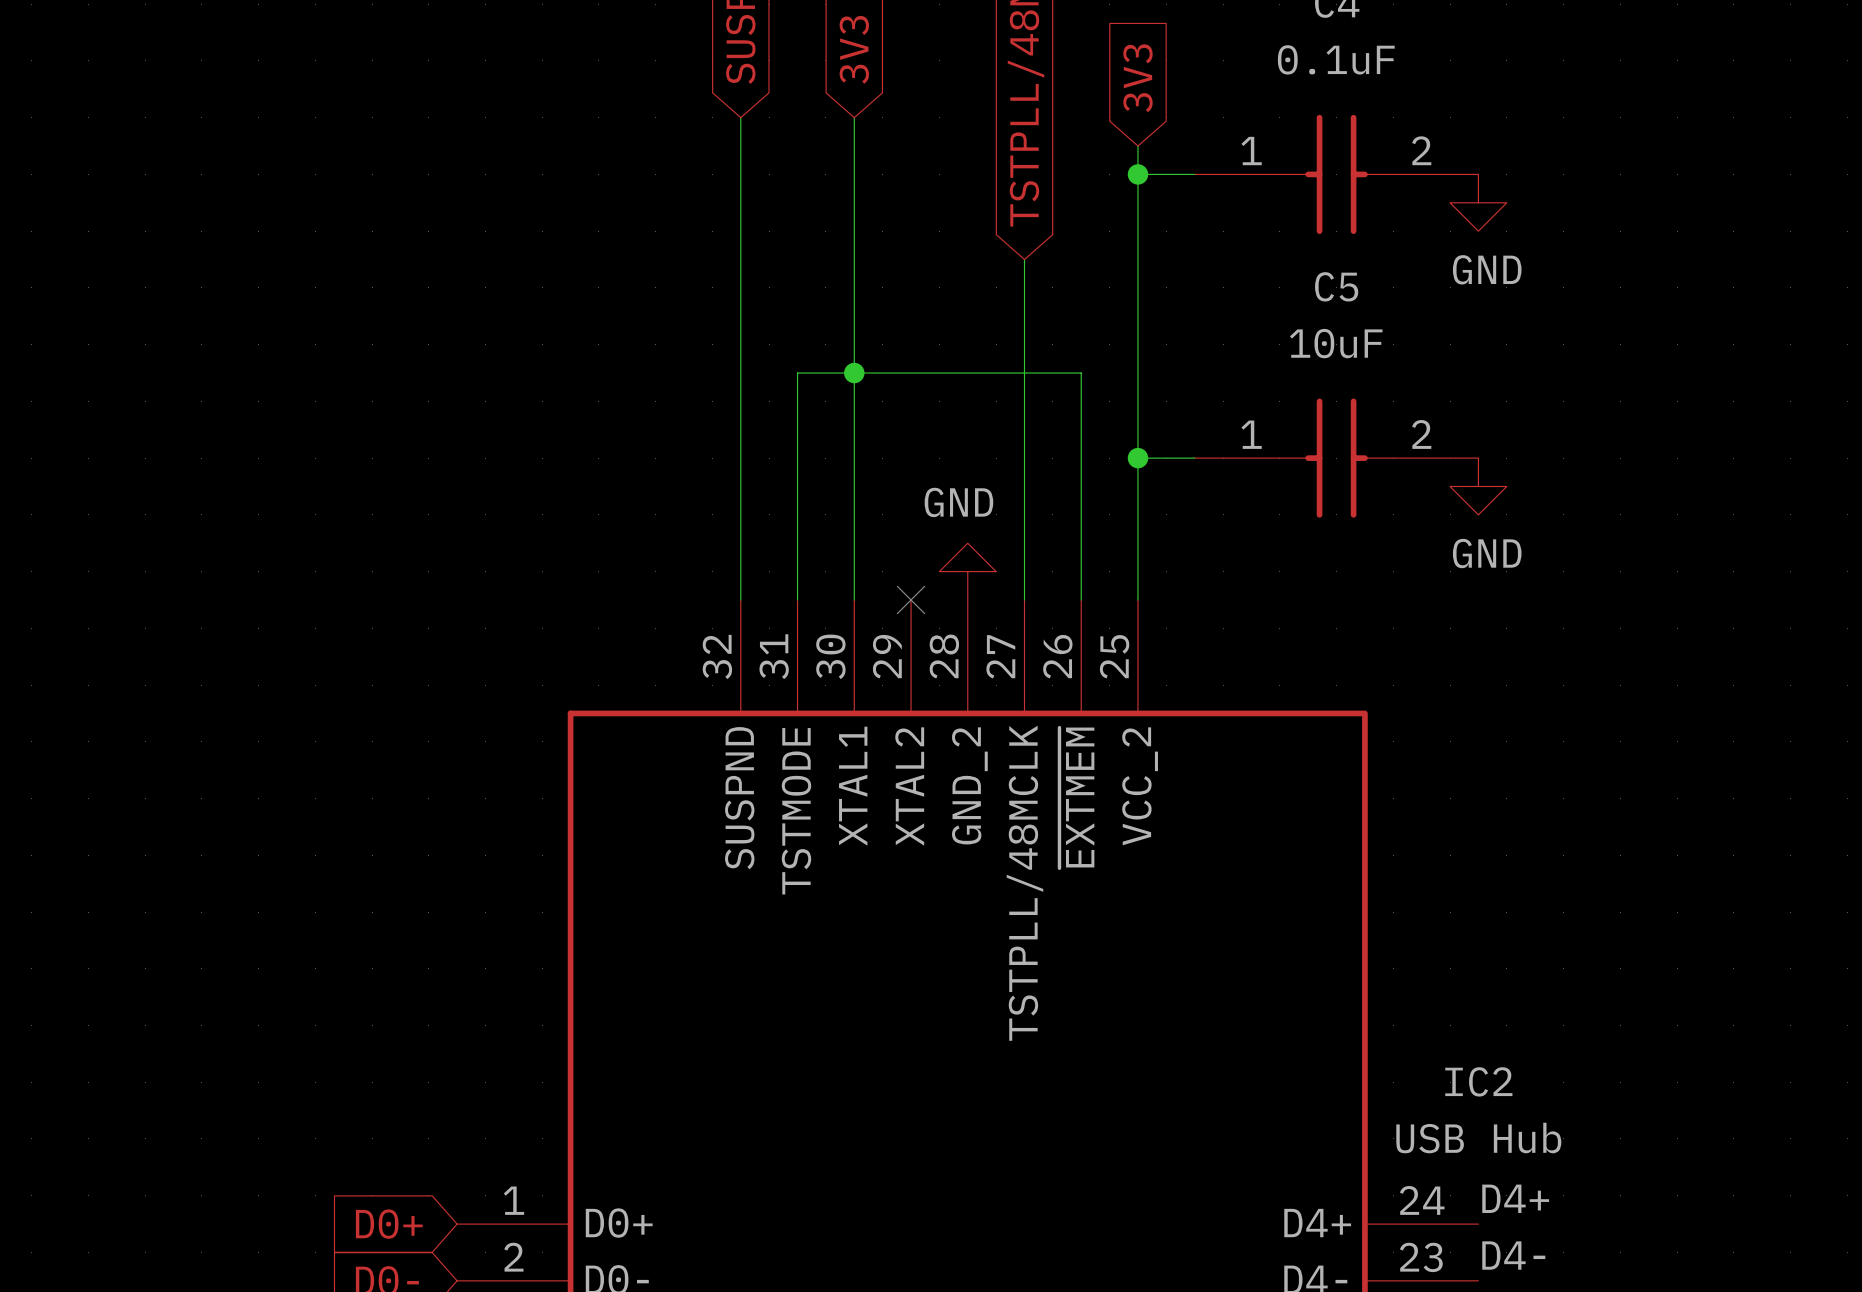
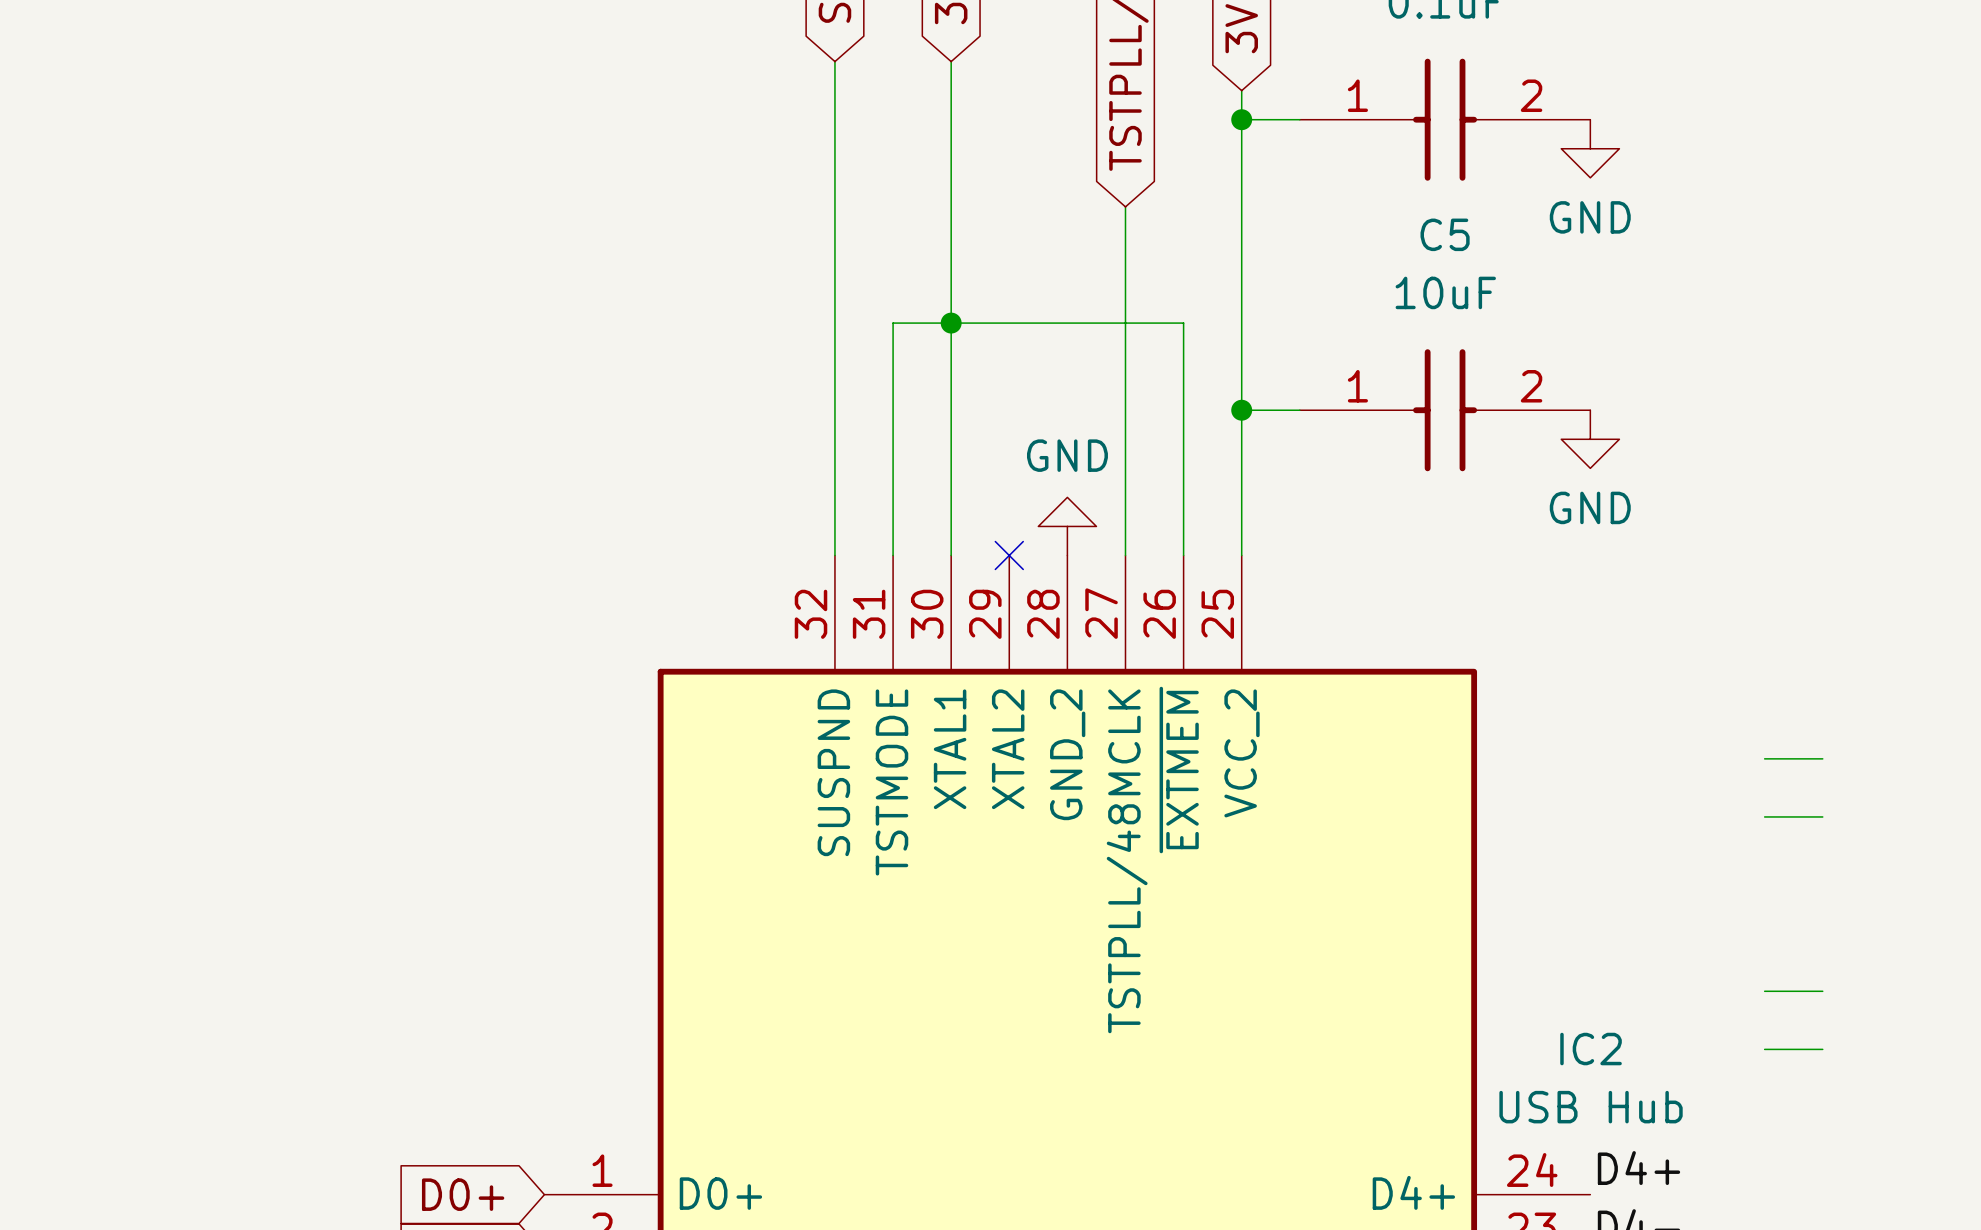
wire: none -> (1764, 758) (1822, 758)
wire: none -> (1764, 816) (1822, 816)
wire: none -> (1764, 991) (1822, 991)
wire: none -> (1764, 1049) (1822, 1049)

